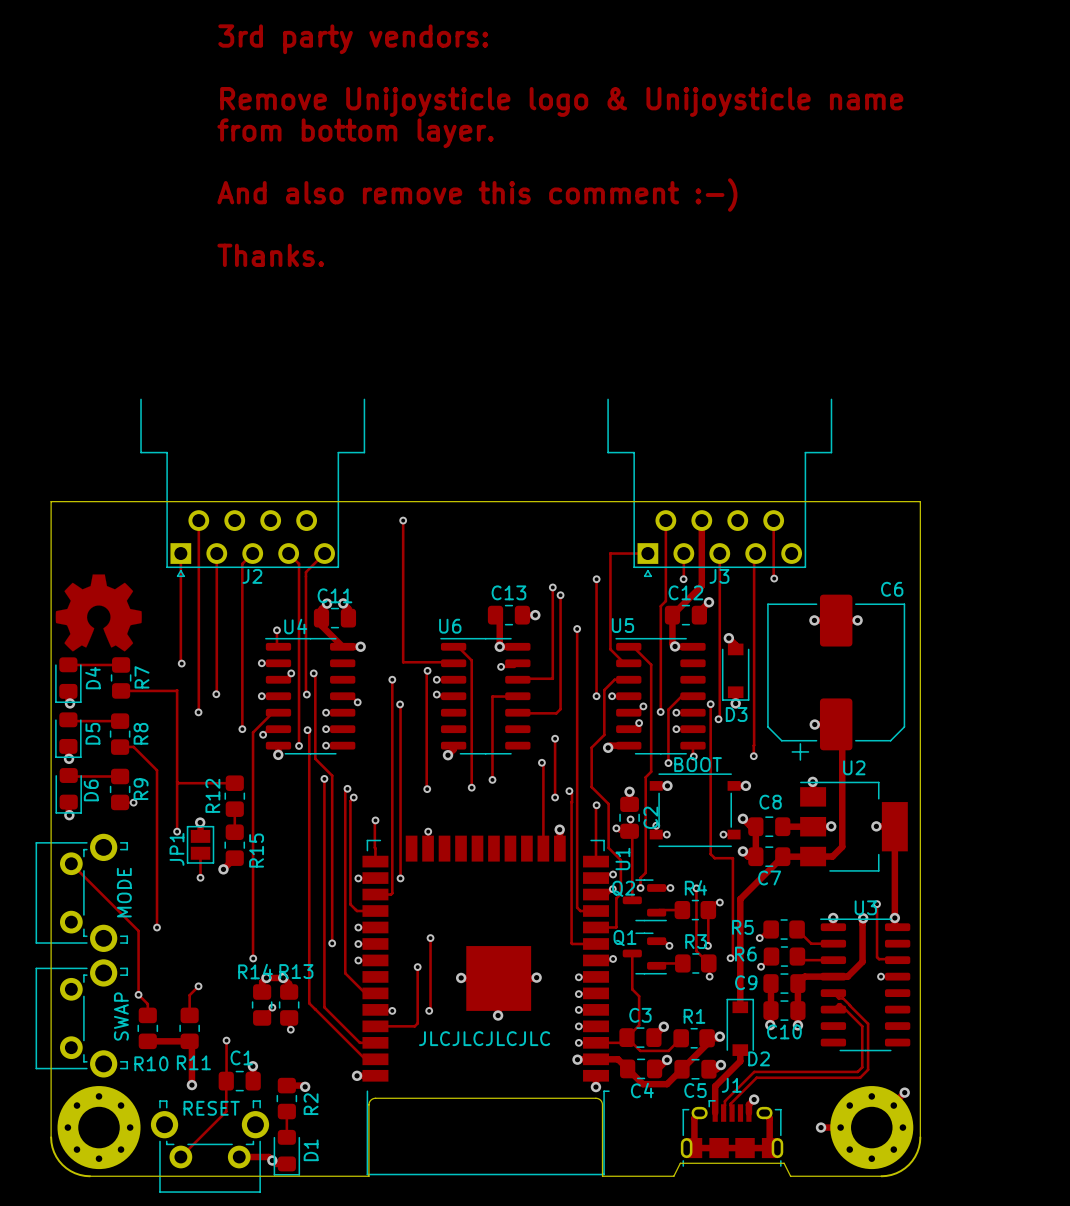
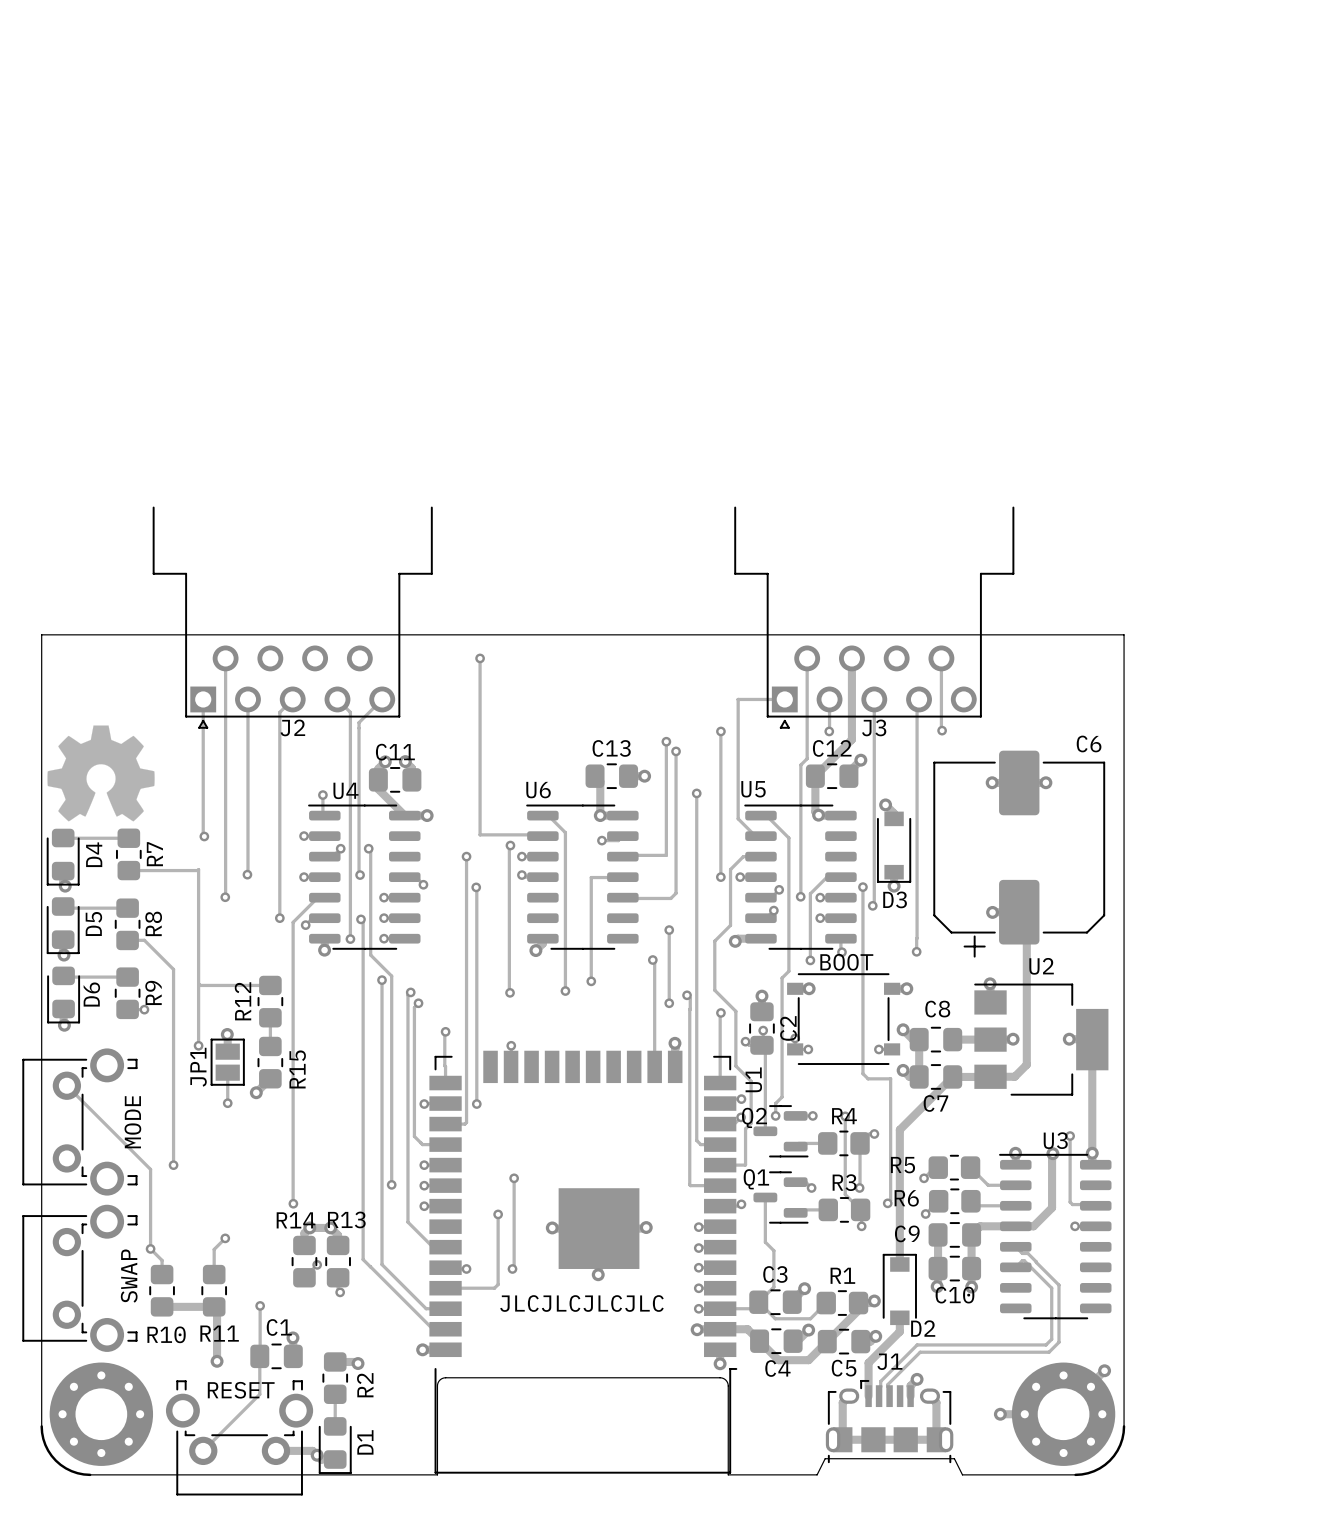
text: 3rd party vendors: (353, 39) -> none
text: Remove Unijoysticle logo & Unijoysticle name (561, 101) -> none
text: from bottom layer. (355, 133) -> none
text: And also remove this comment :-) (477, 194) -> none
text: Thanks. (270, 255) -> none

